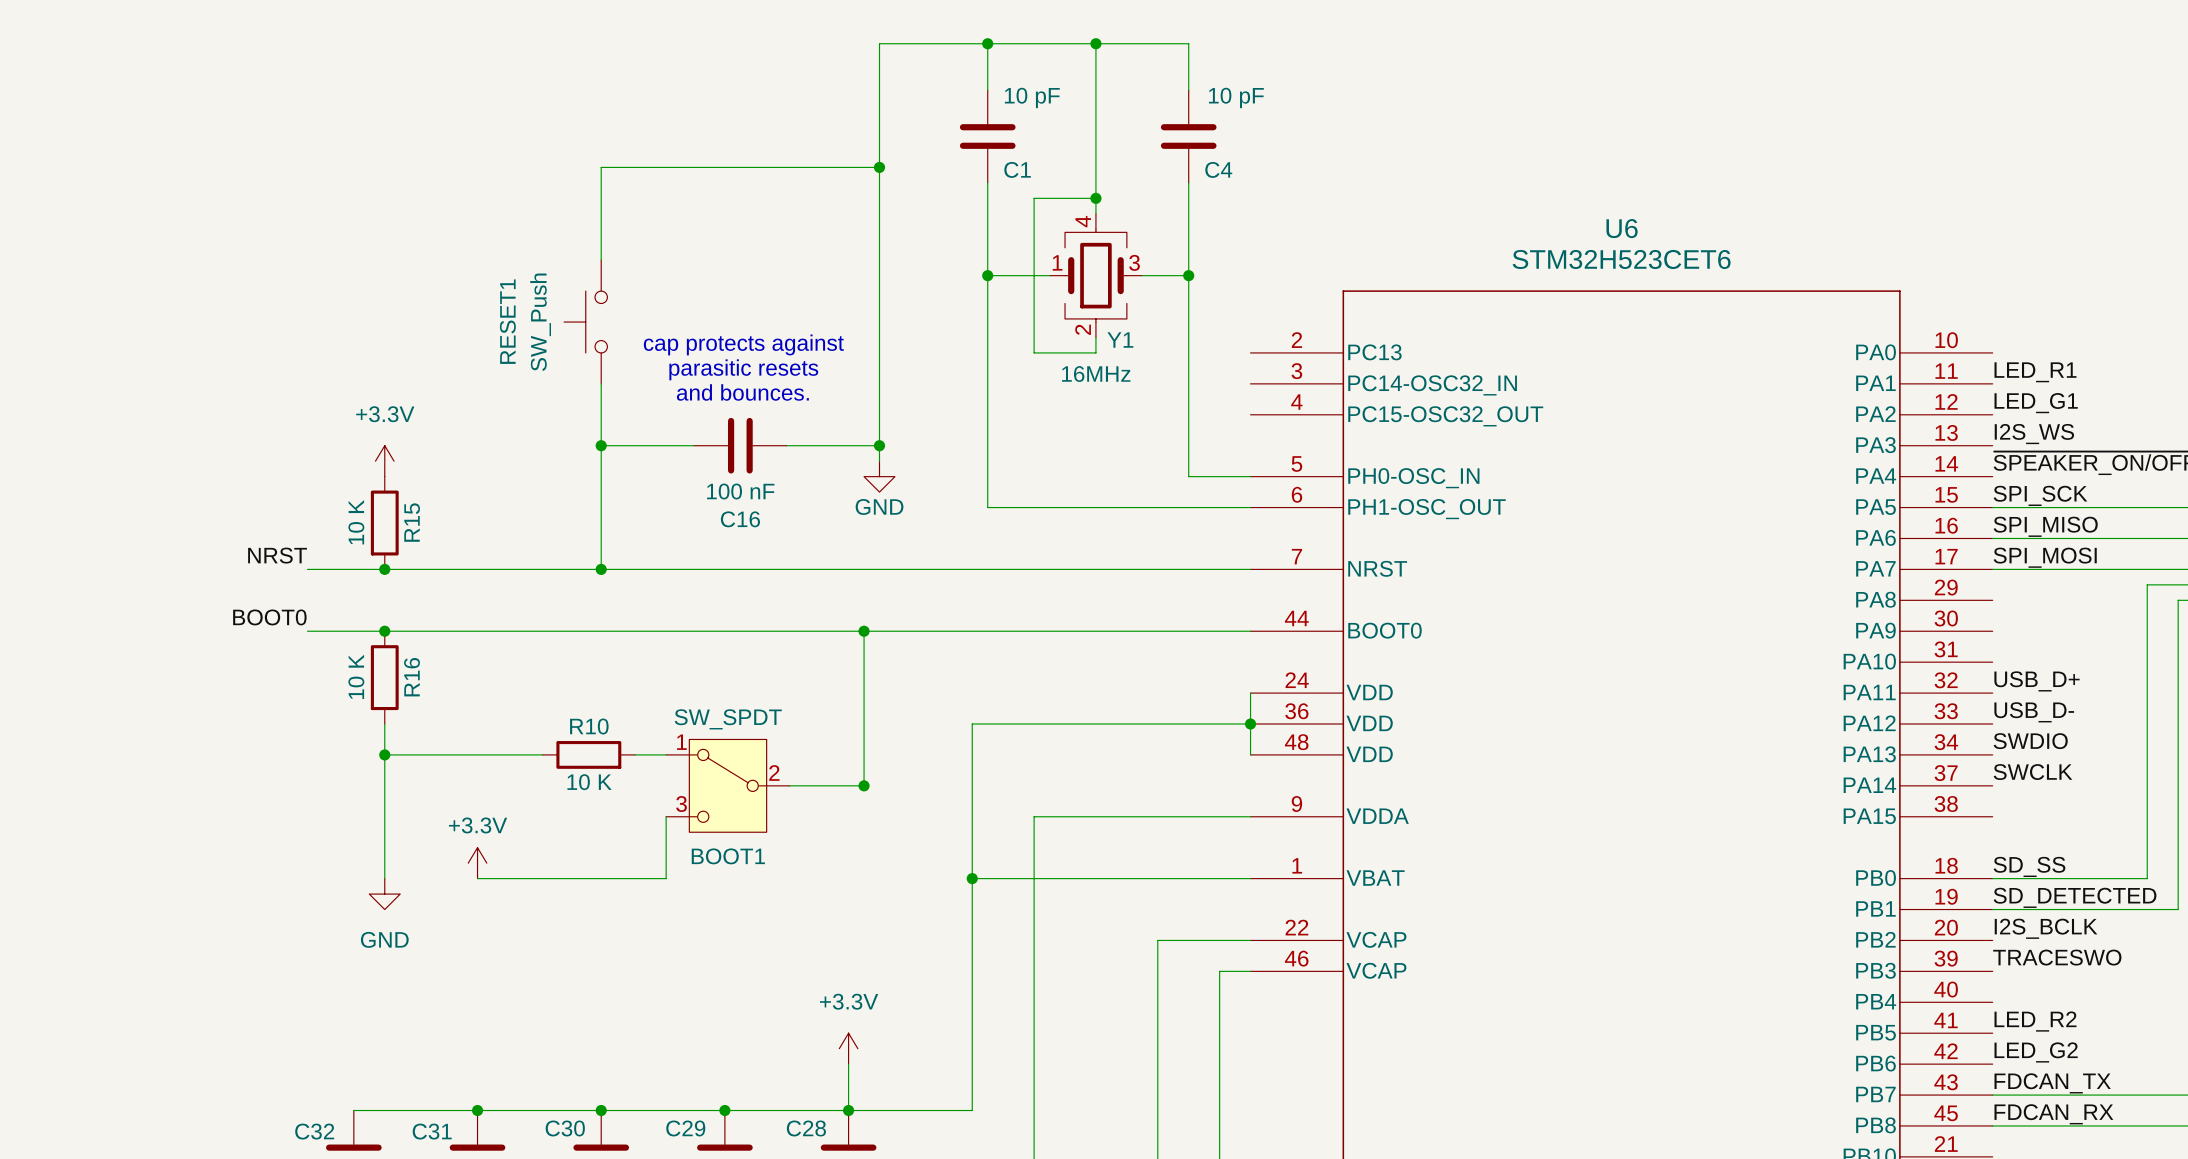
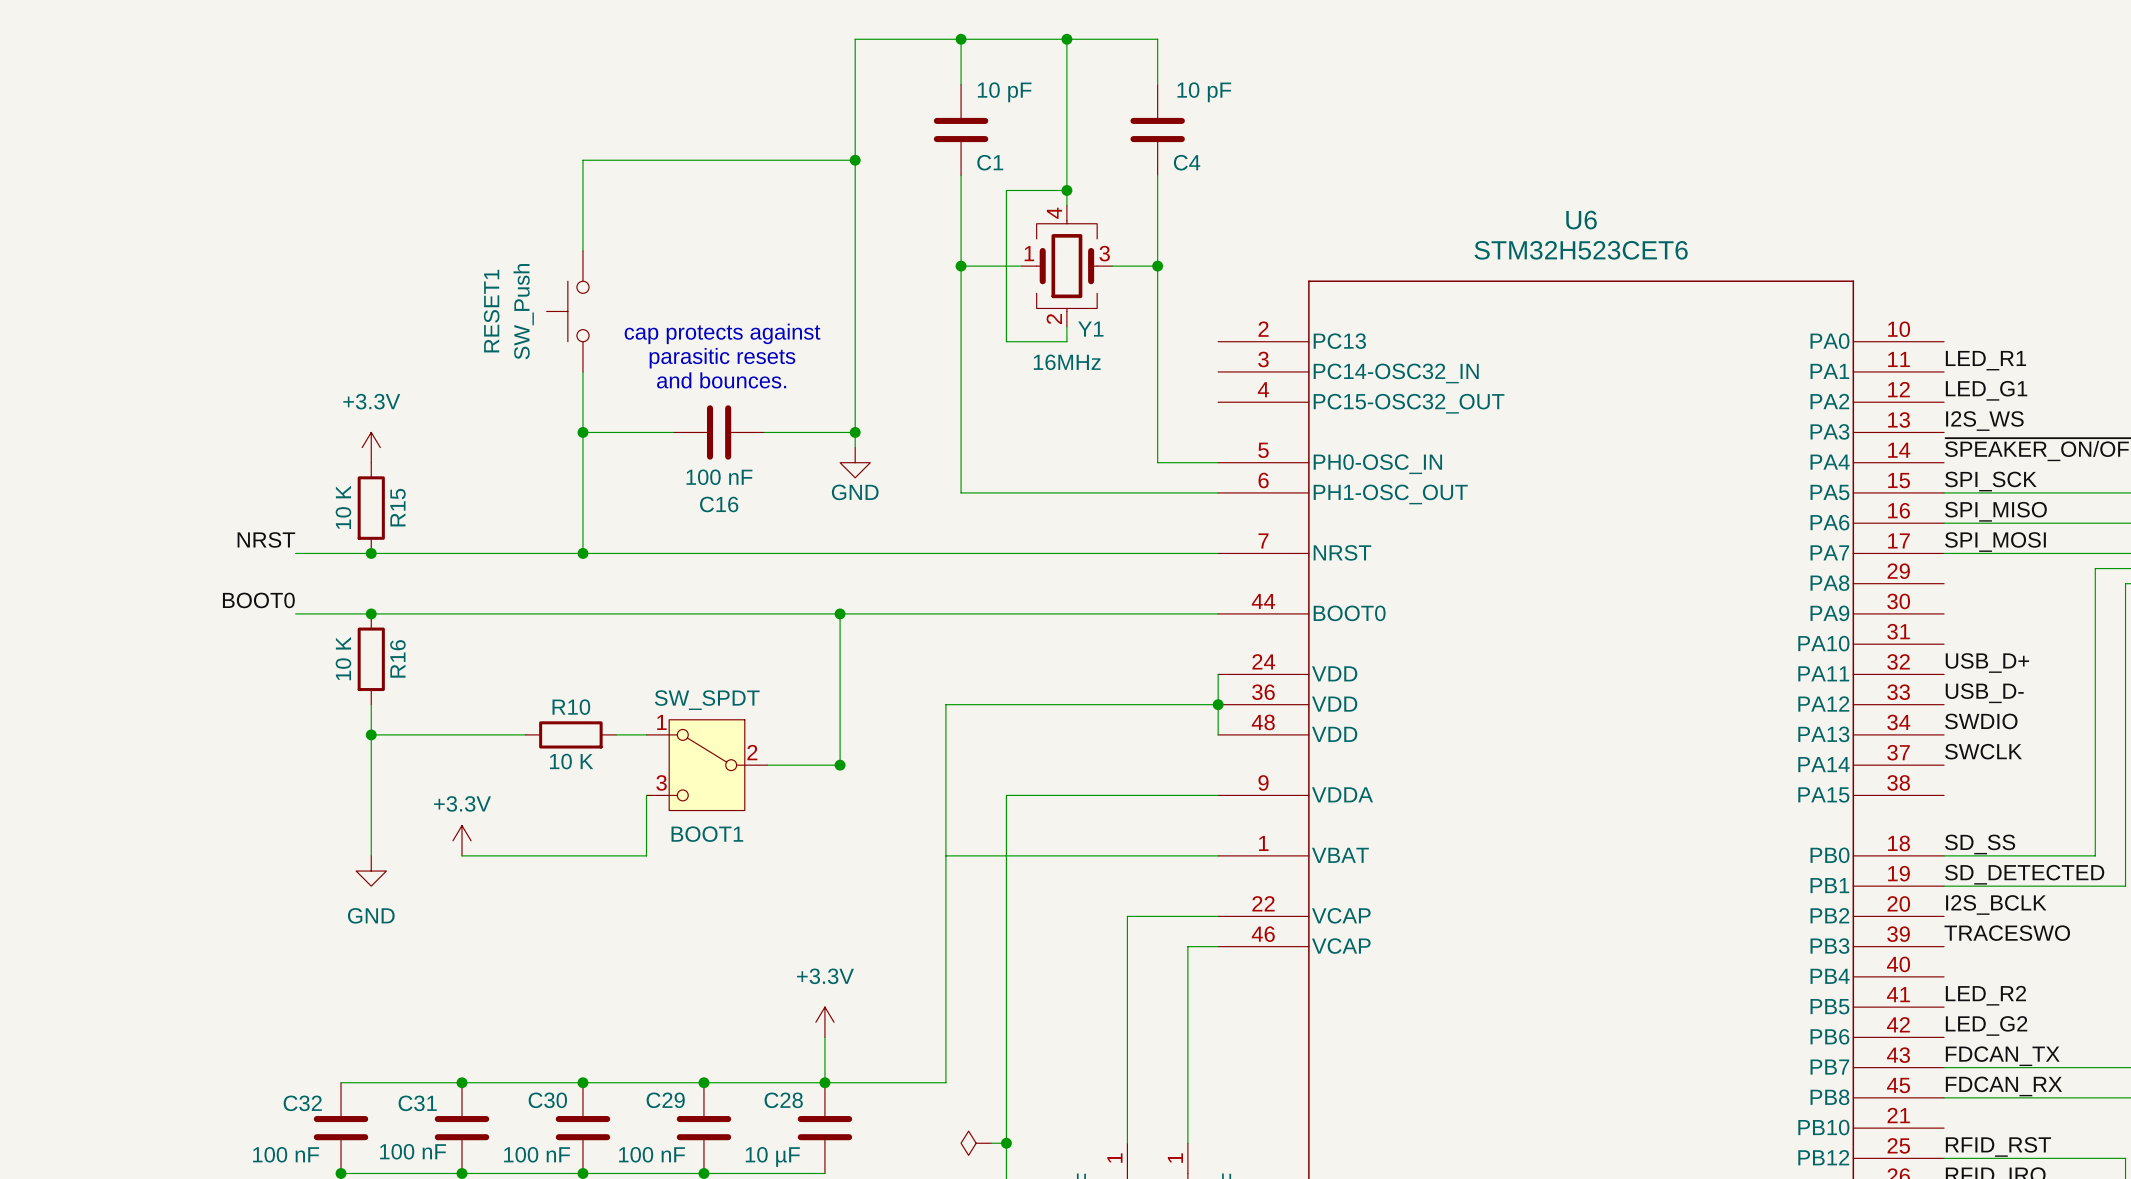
junction: (972, 878) -> none

